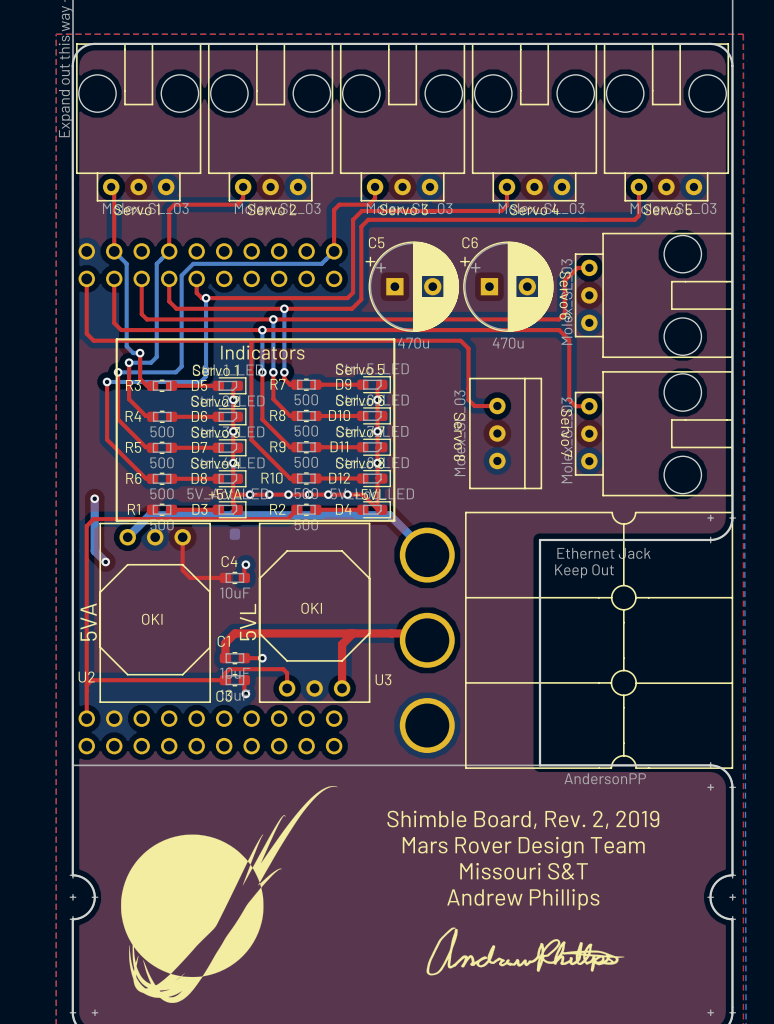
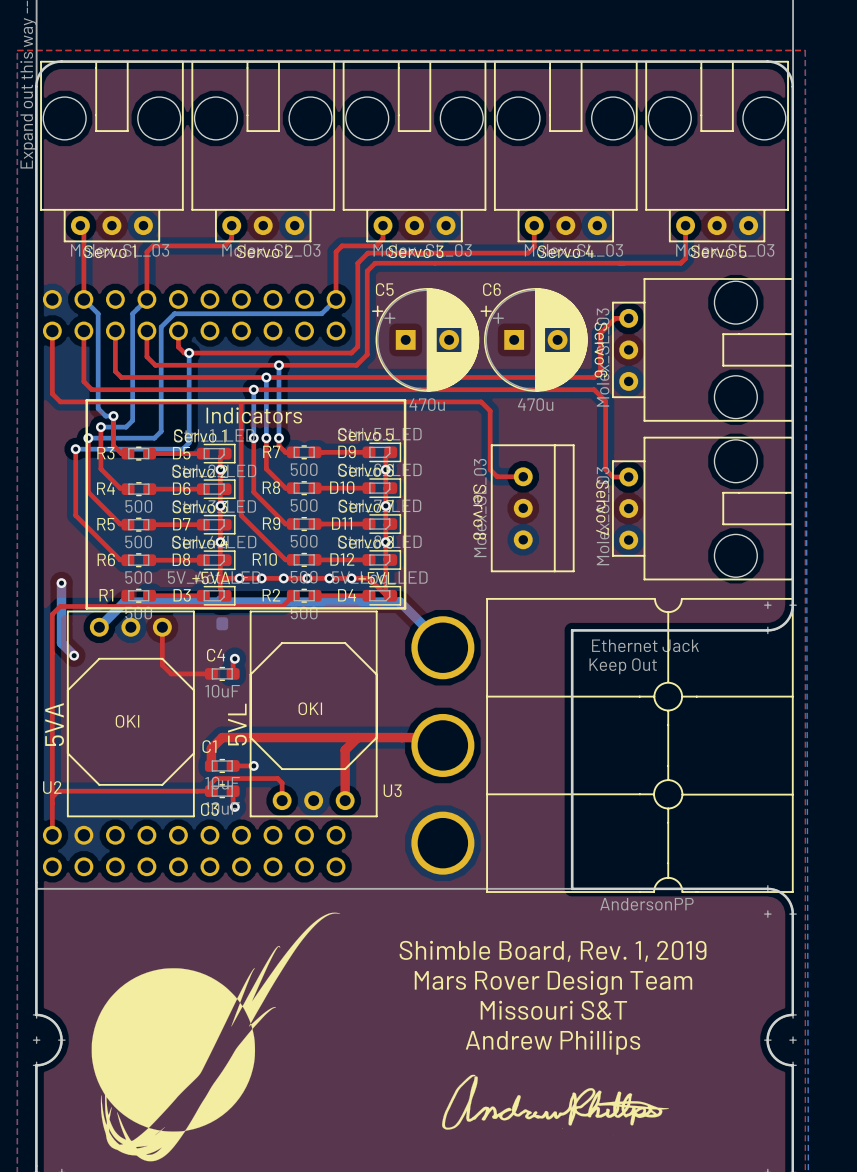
text: Shimble Board, Rev. 2, 2019 (523, 819) -> Shimble Board, Rev. 1, 2019 (553, 951)

